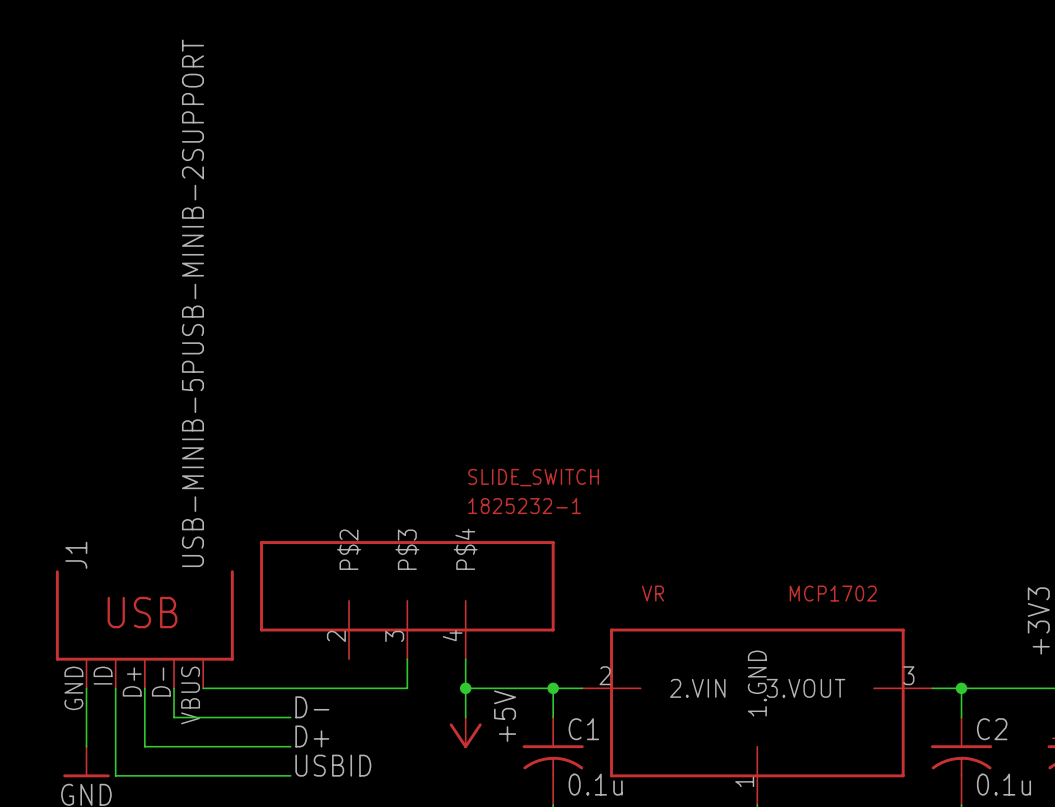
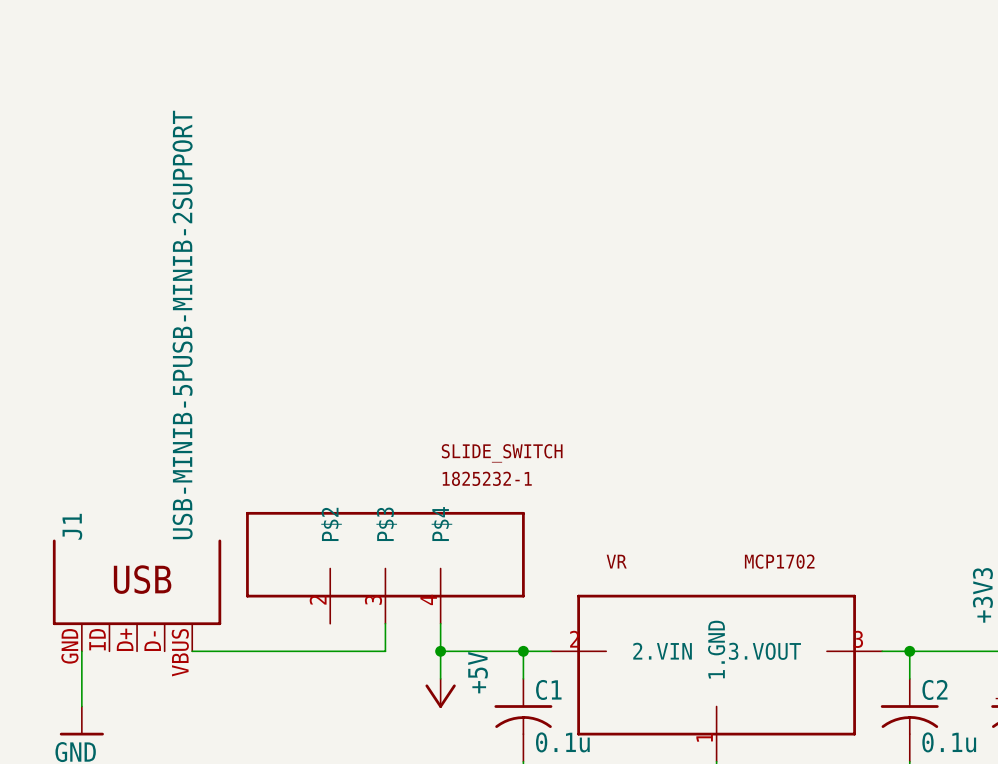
wire: (115, 688) (115, 775) (290, 775) -> none
wire: (144, 688) (144, 746) (290, 746) -> none
wire: (174, 688) (174, 717) (290, 717) -> none
label: D- (312, 707) -> none
label: D+ (312, 736) -> none
label: USBID (333, 765) -> none

